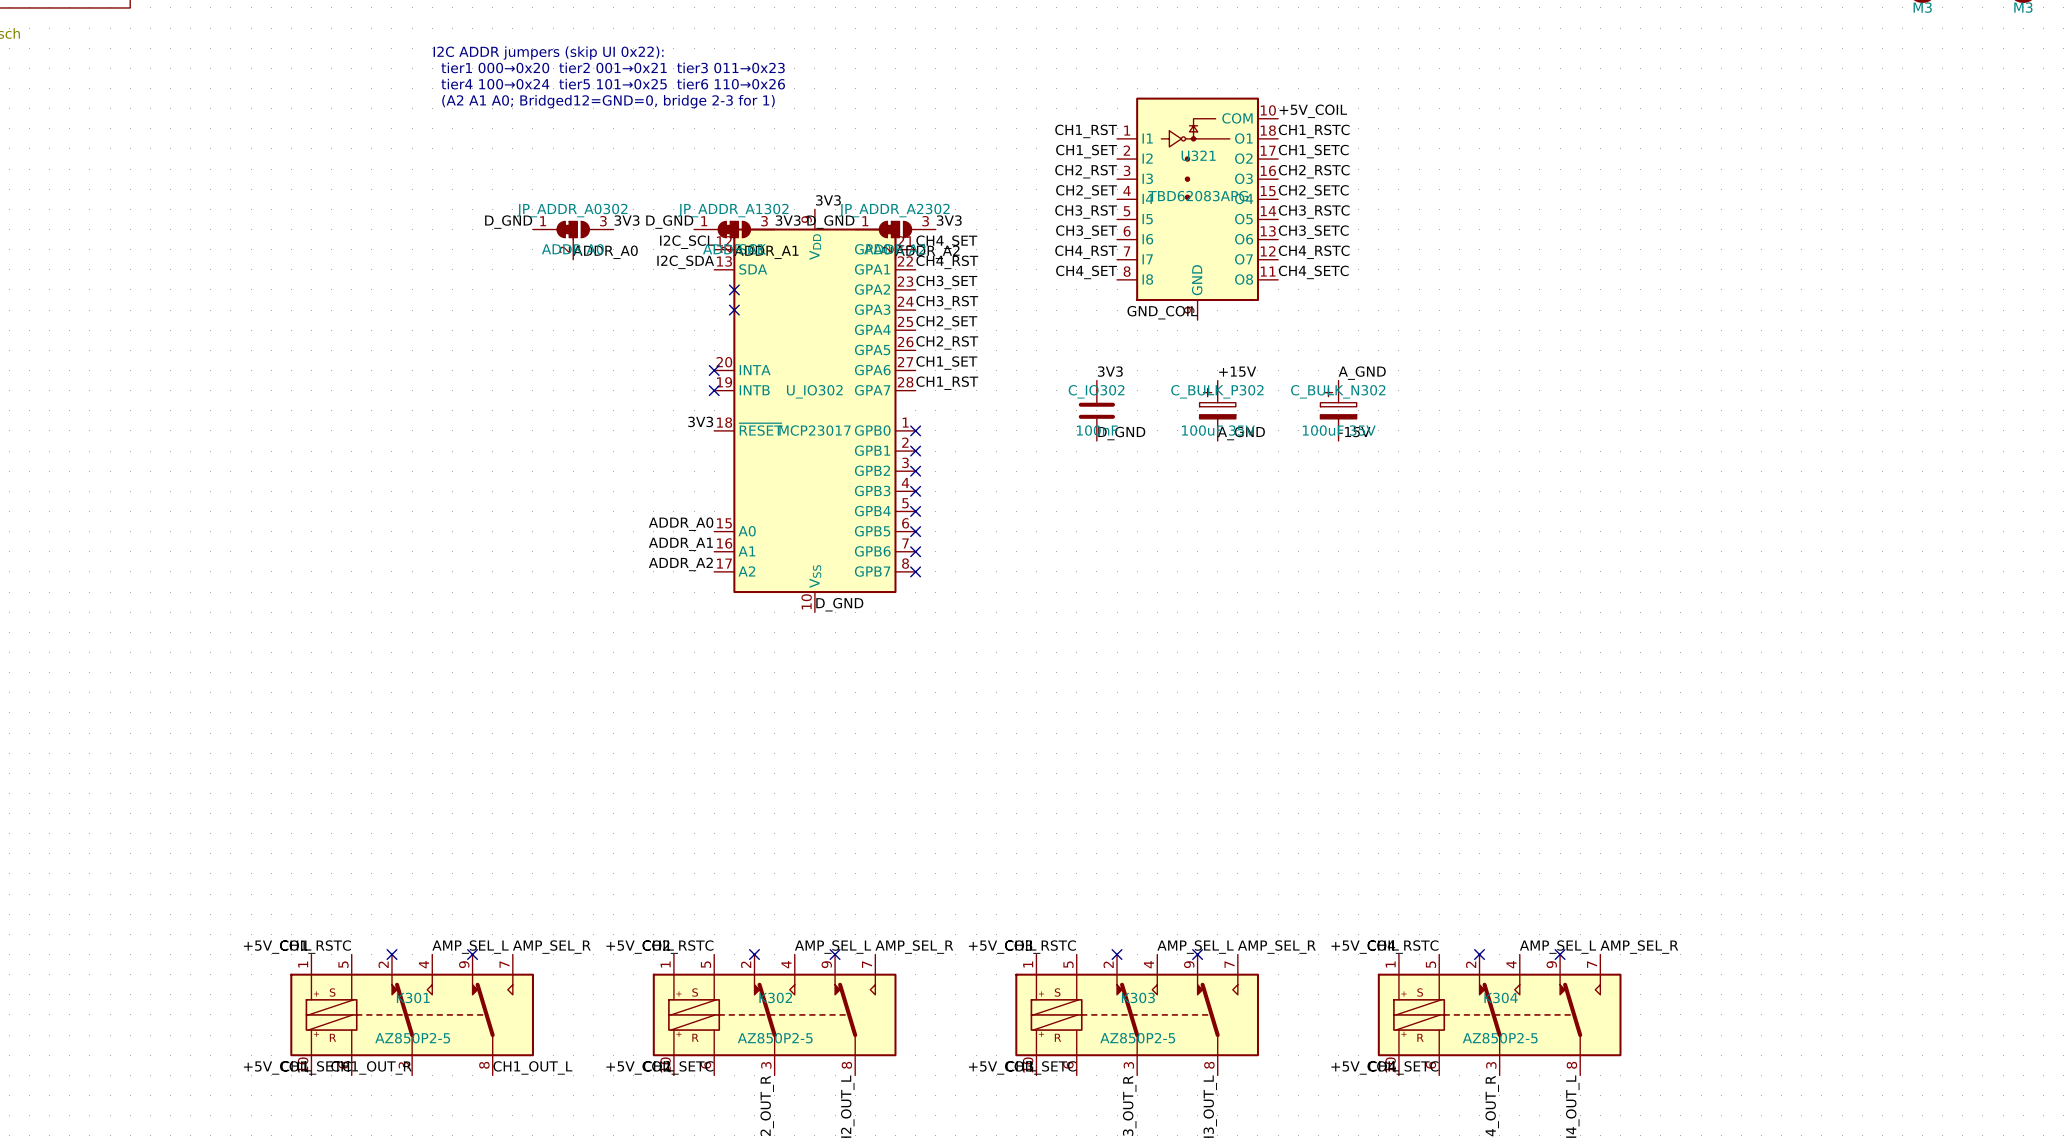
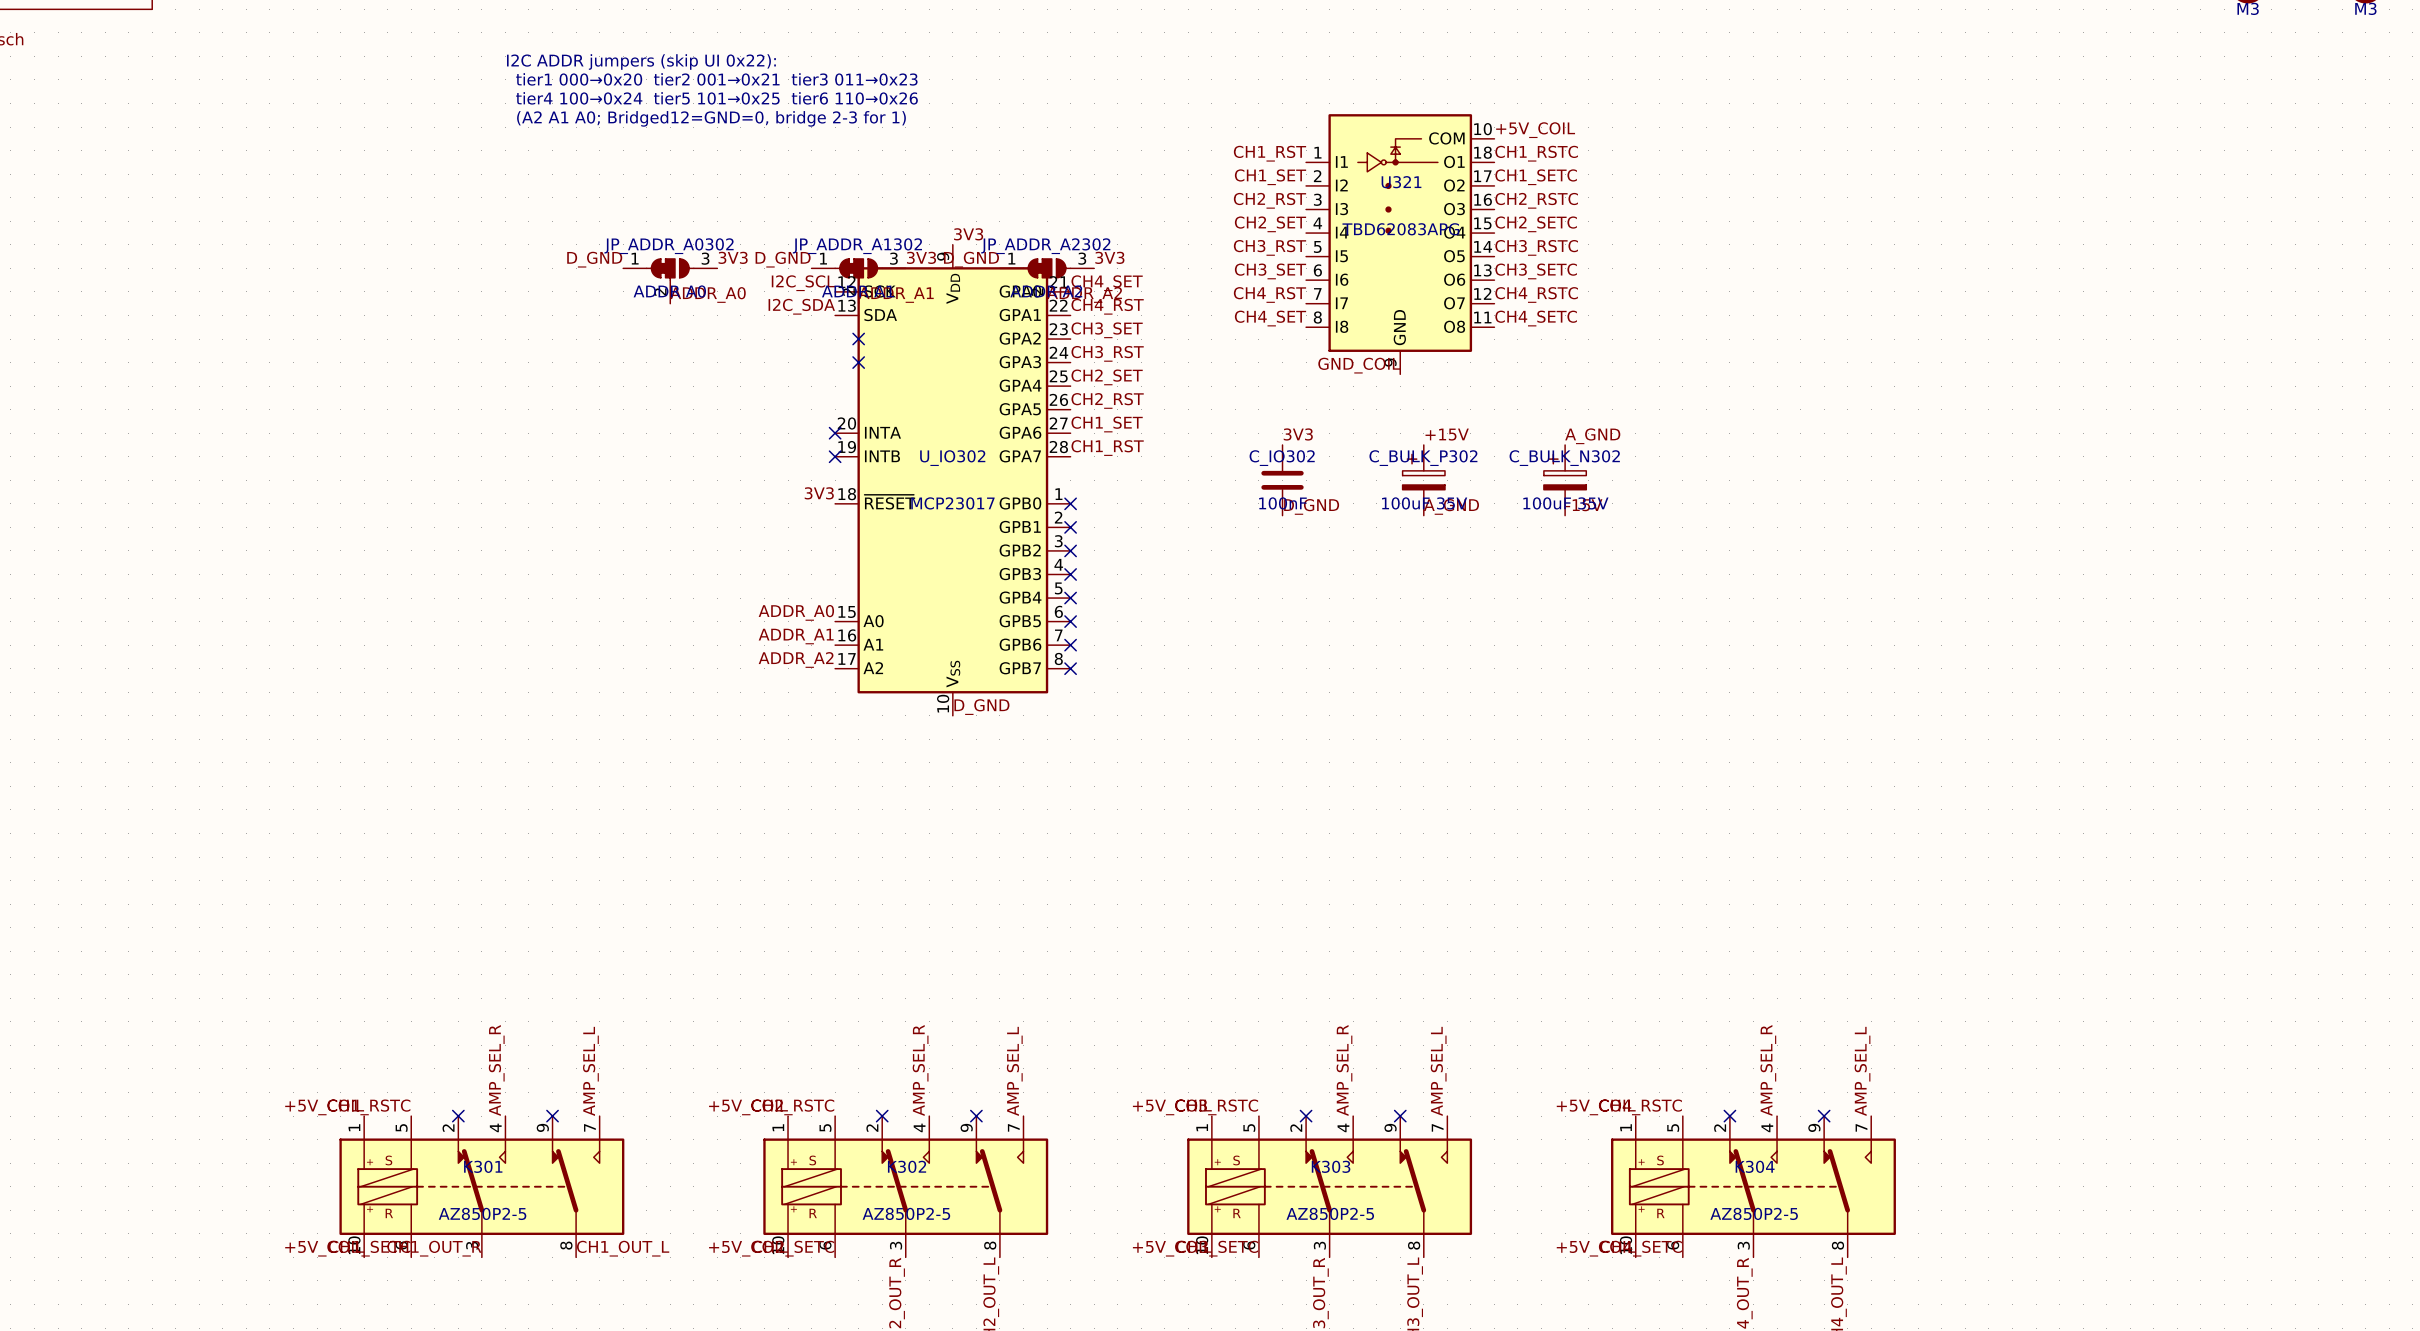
label: AMP_SEL_L (470, 947) -> AMP_SEL_R (496, 1070)
label: AMP_SEL_R (551, 947) -> AMP_SEL_L (590, 1071)
label: AMP_SEL_L (832, 947) -> AMP_SEL_R (920, 1070)
label: AMP_SEL_R (914, 947) -> AMP_SEL_L (1014, 1071)
label: AMP_SEL_L (1195, 947) -> AMP_SEL_R (1344, 1070)
label: AMP_SEL_R (1276, 947) -> AMP_SEL_L (1438, 1071)
label: AMP_SEL_L (1558, 947) -> AMP_SEL_R (1768, 1070)
label: AMP_SEL_R (1639, 947) -> AMP_SEL_L (1862, 1071)

